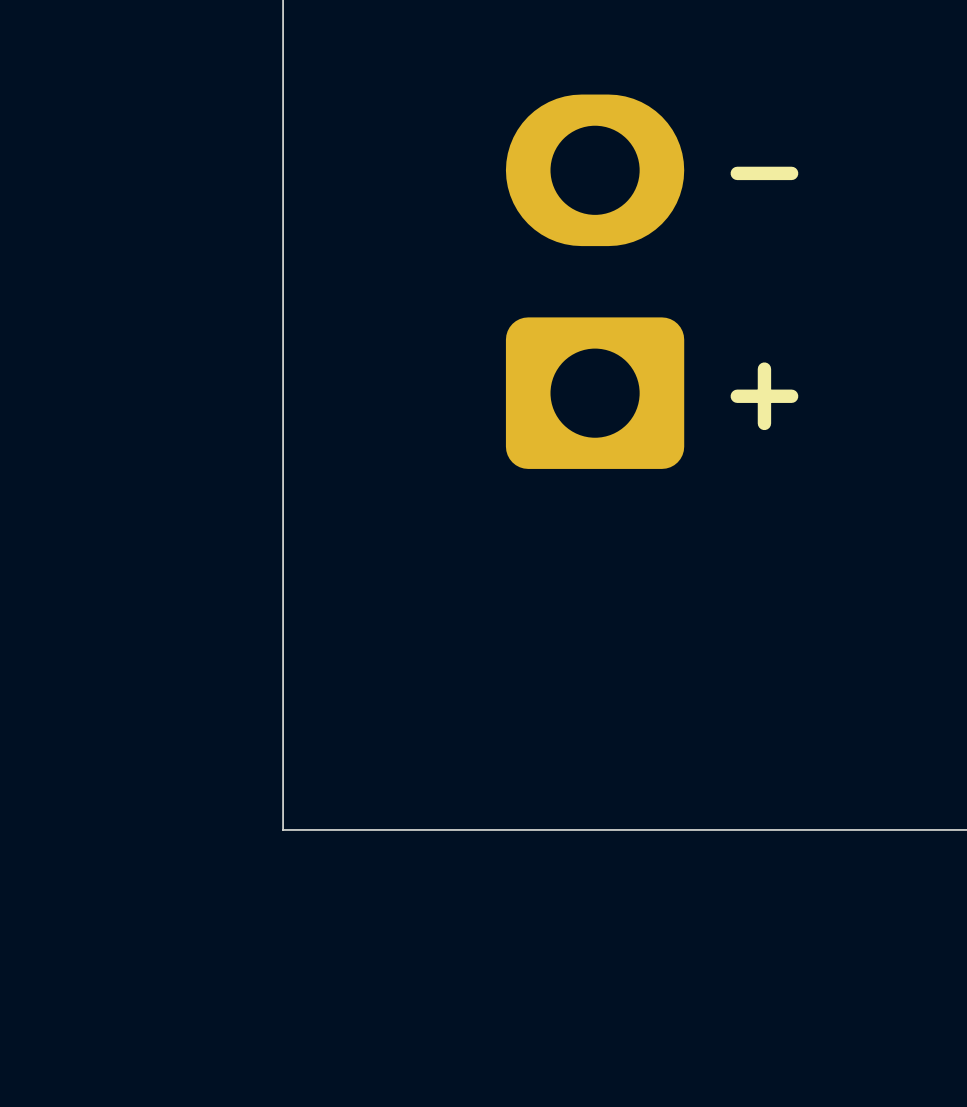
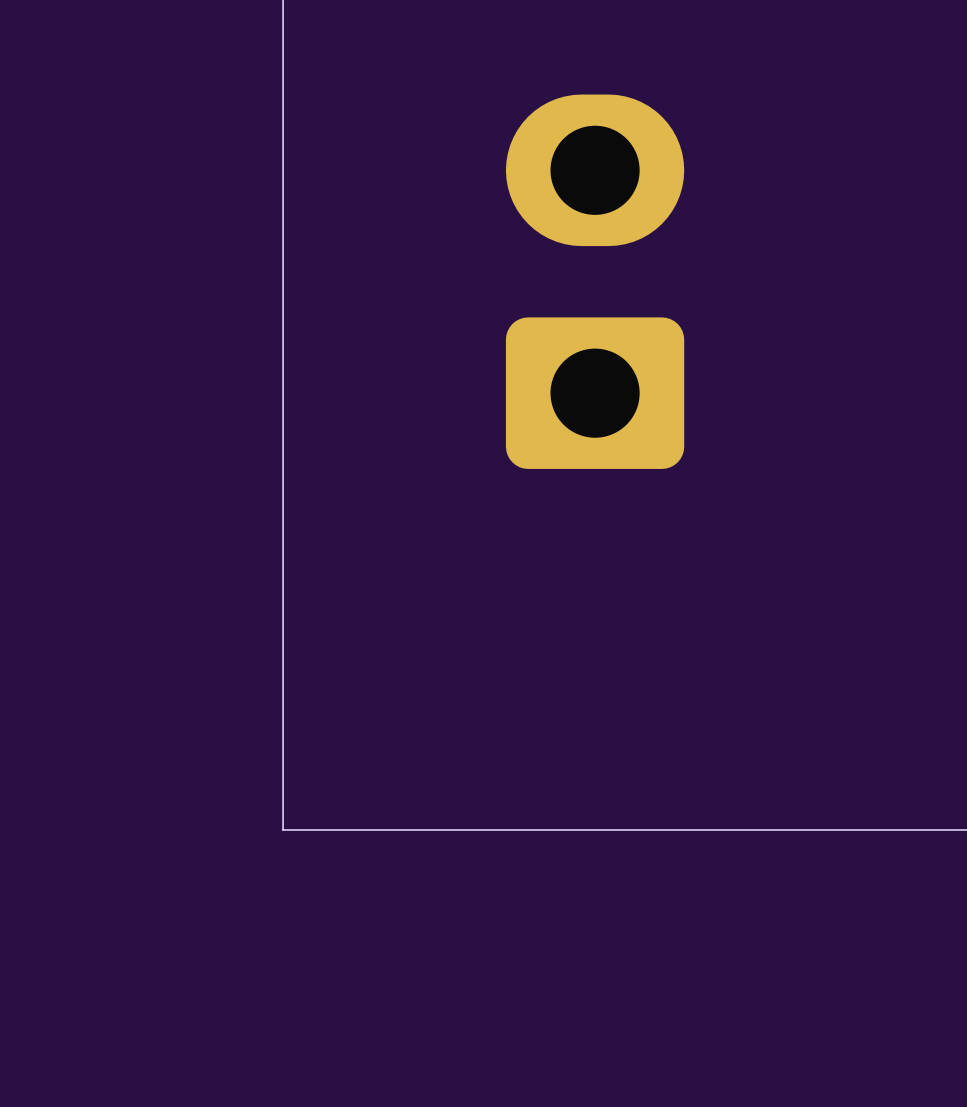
text: - (764, 173) -> none
text: + (764, 396) -> none

